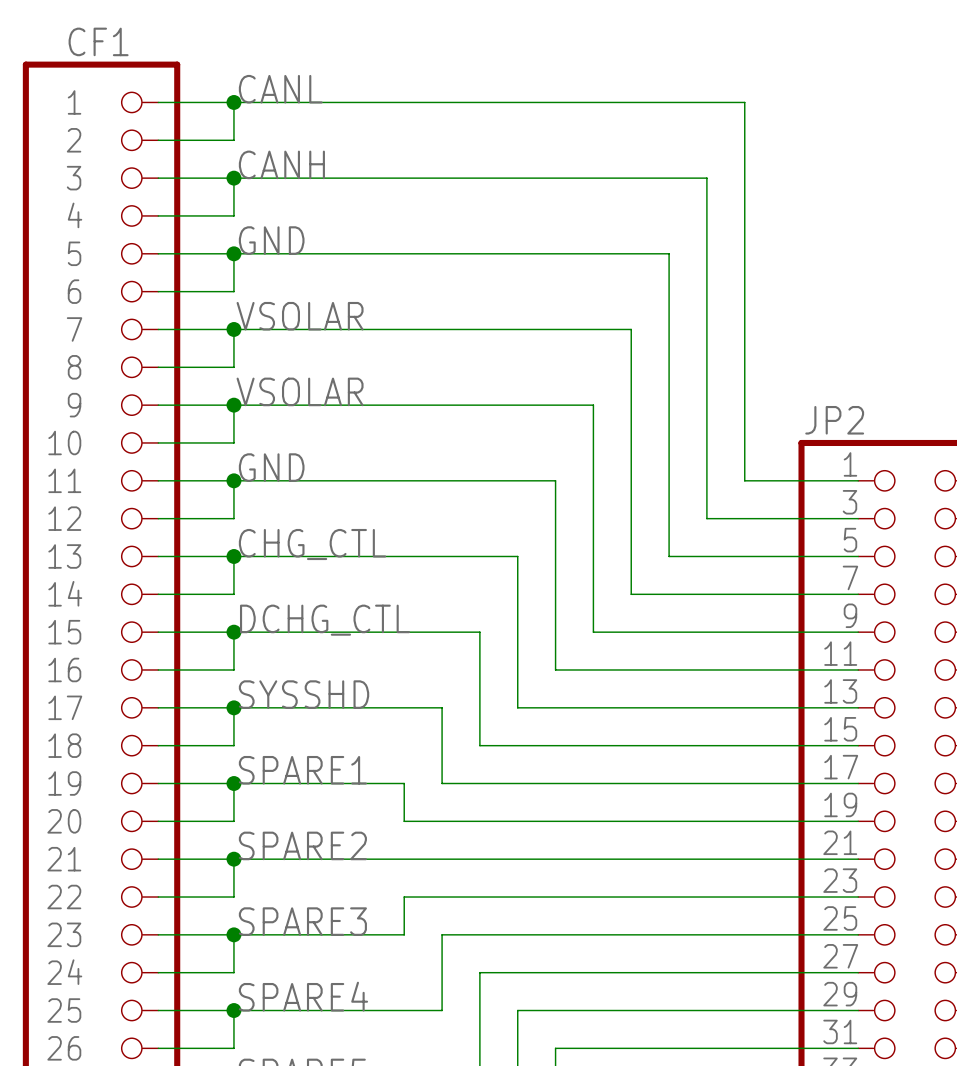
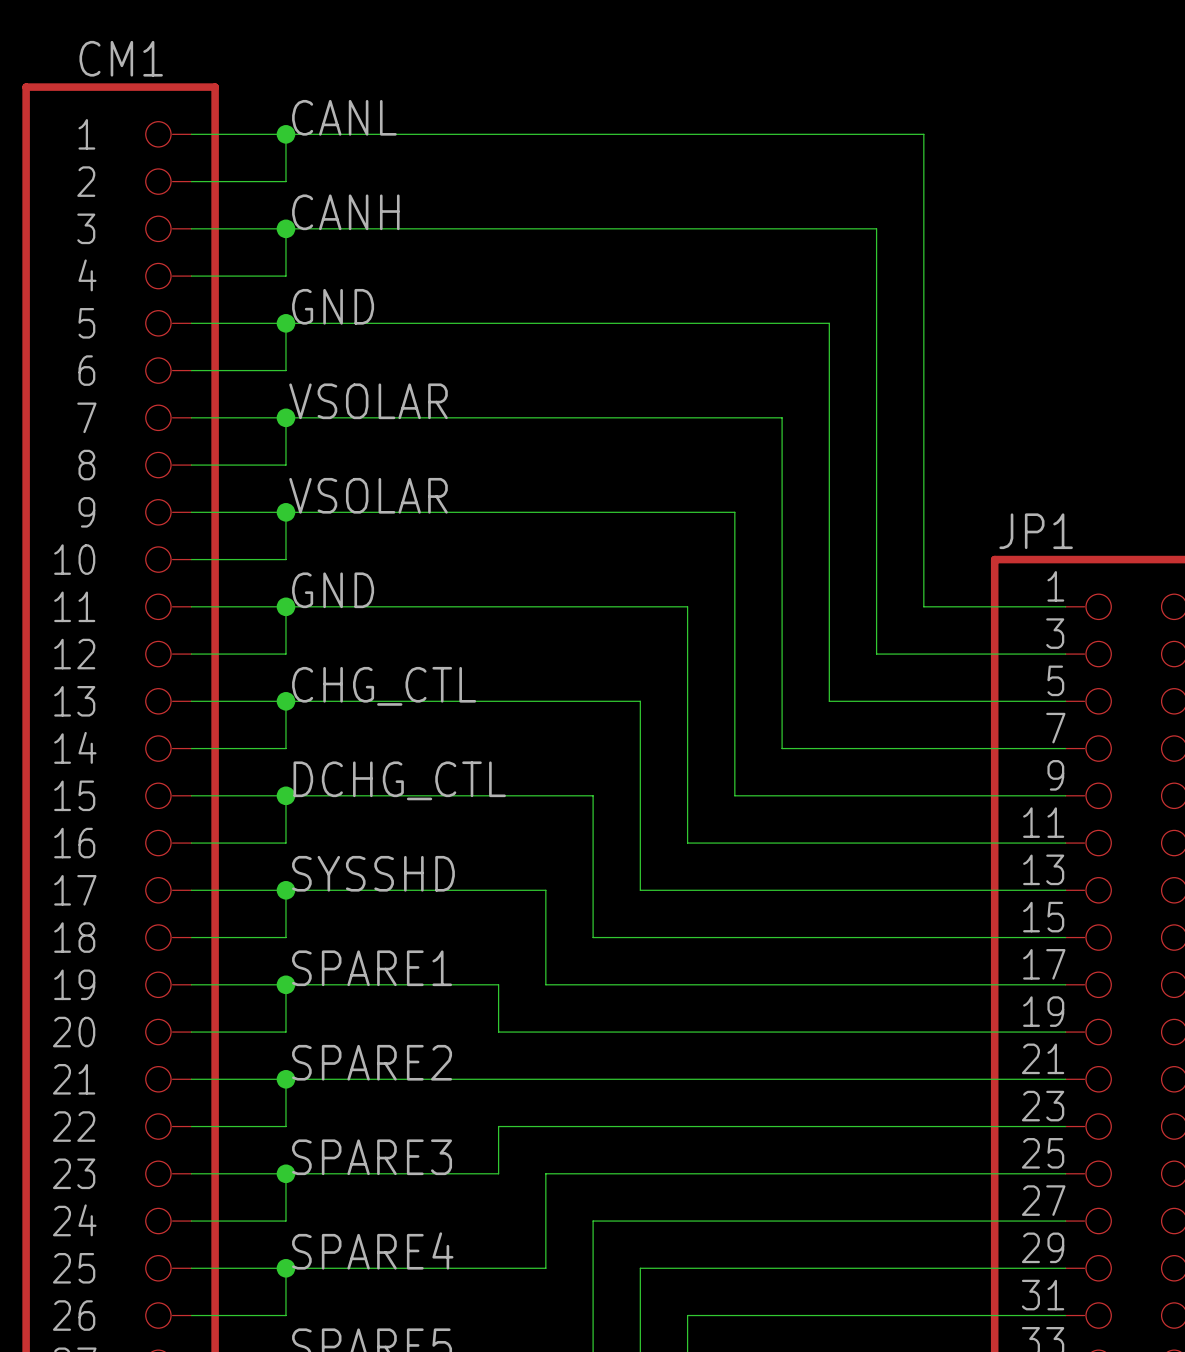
CF1 name: CF1 (98, 41) -> CM1 (121, 58)
JP2 name: JP2 (834, 420) -> JP1 (1036, 531)

